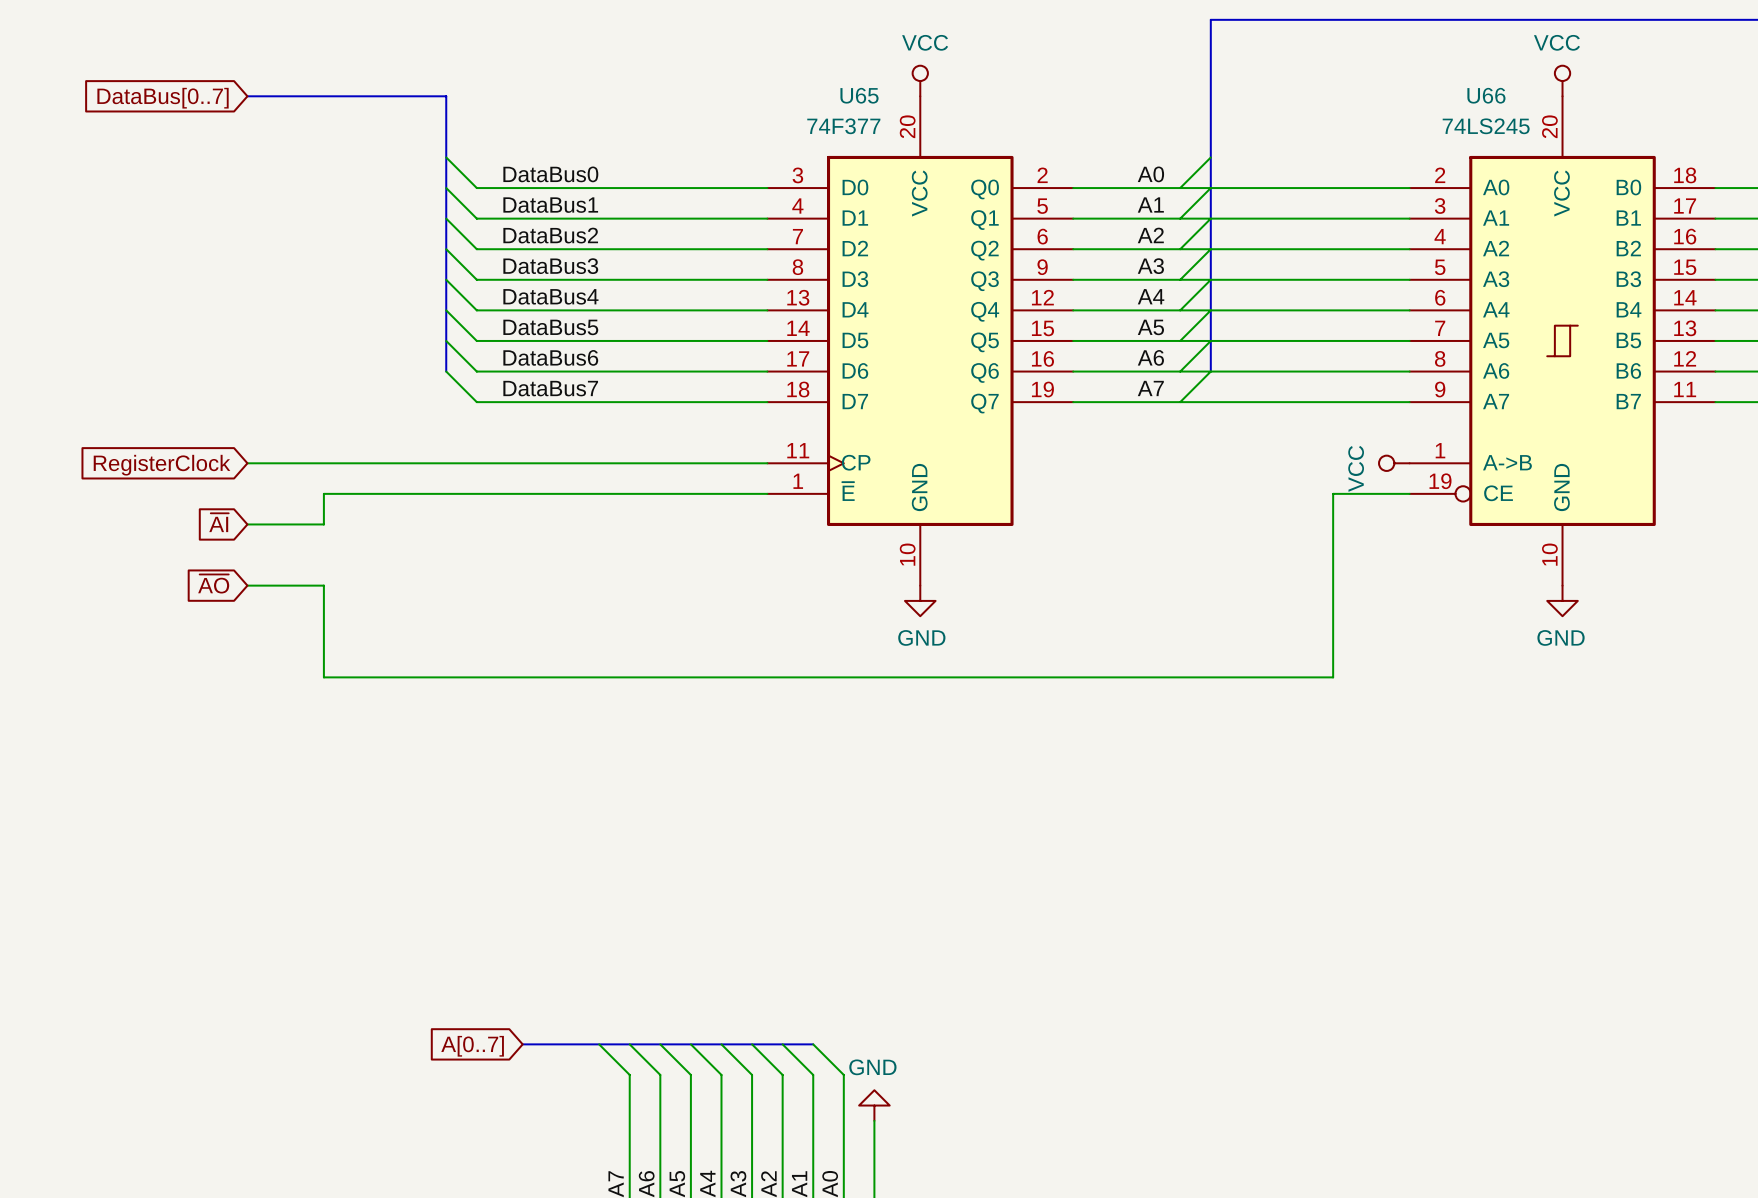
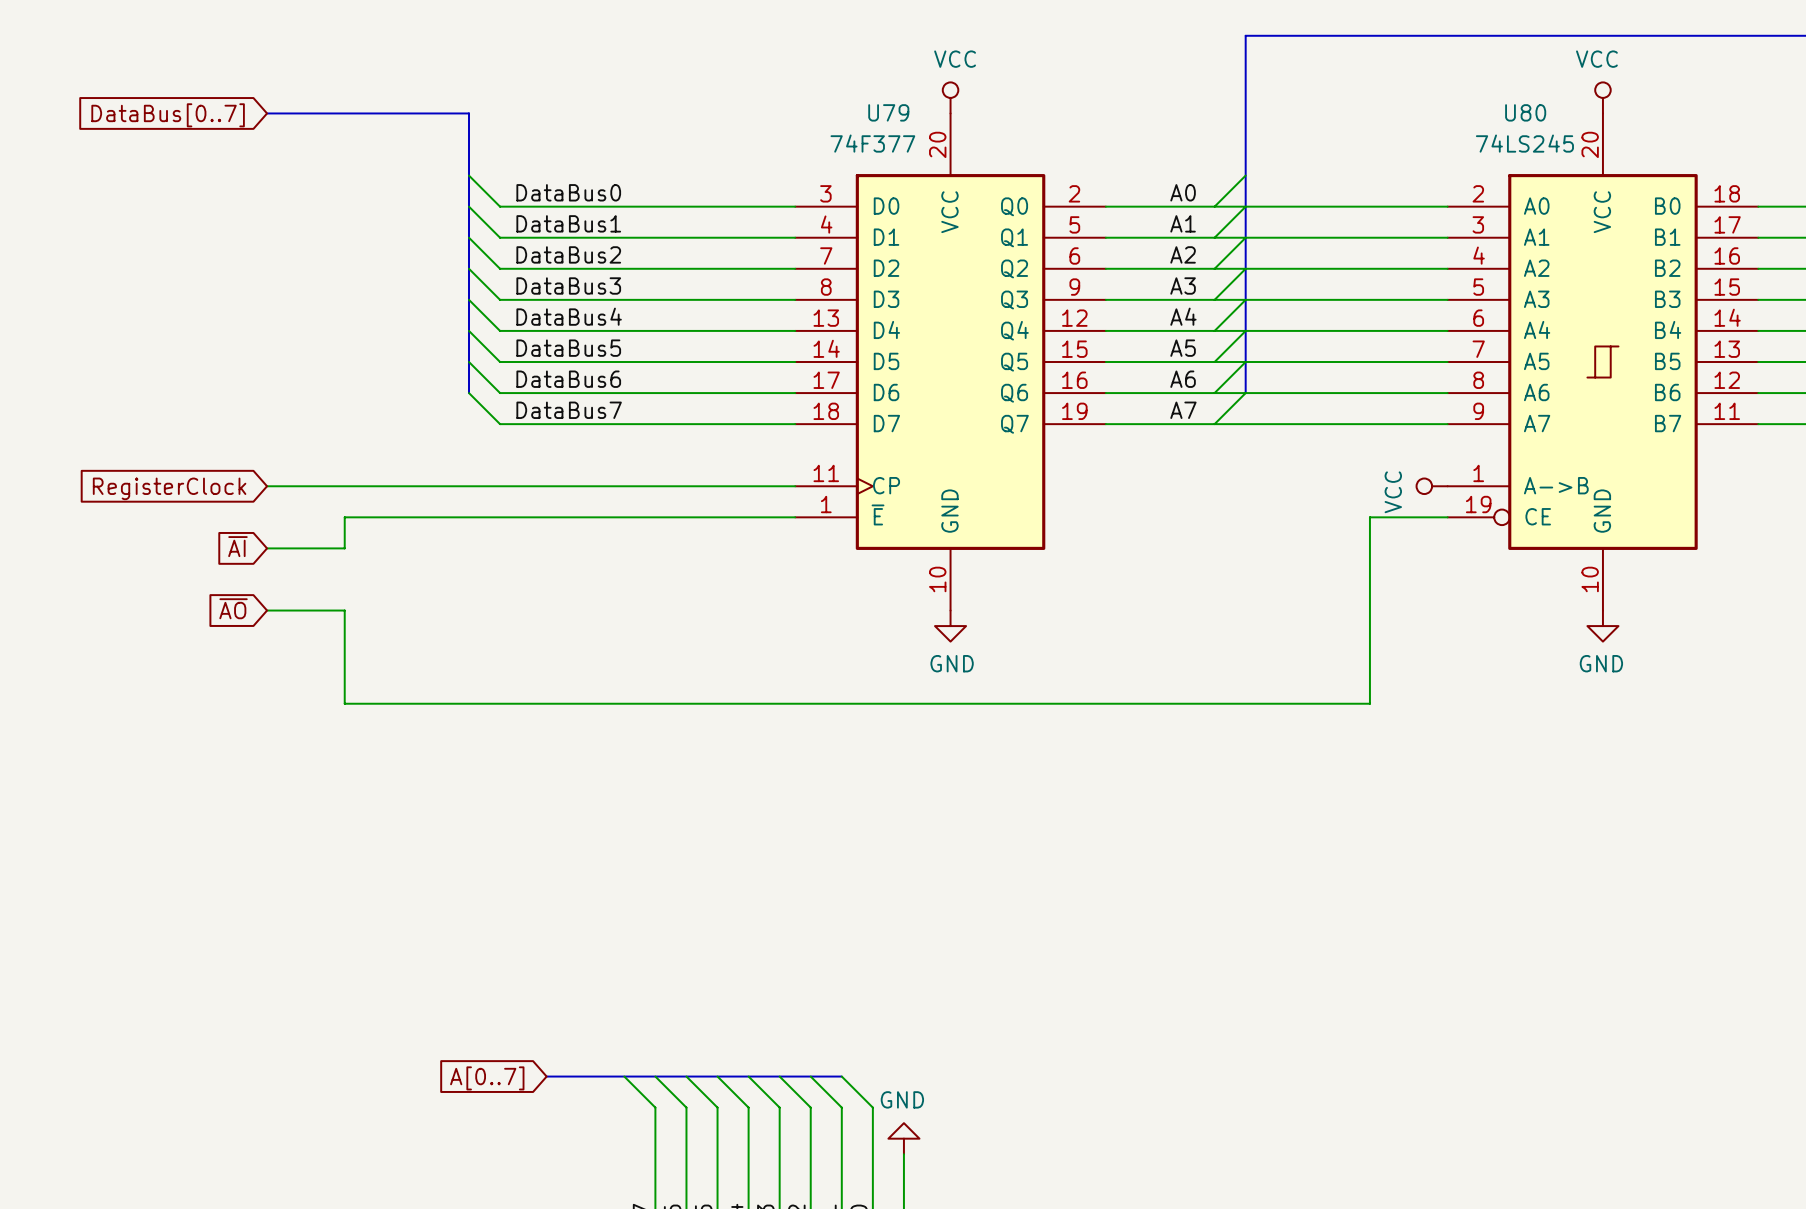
U65 name: U65 (859, 95) -> U79 (888, 112)
U66 name: U66 (1486, 95) -> U80 (1525, 112)

